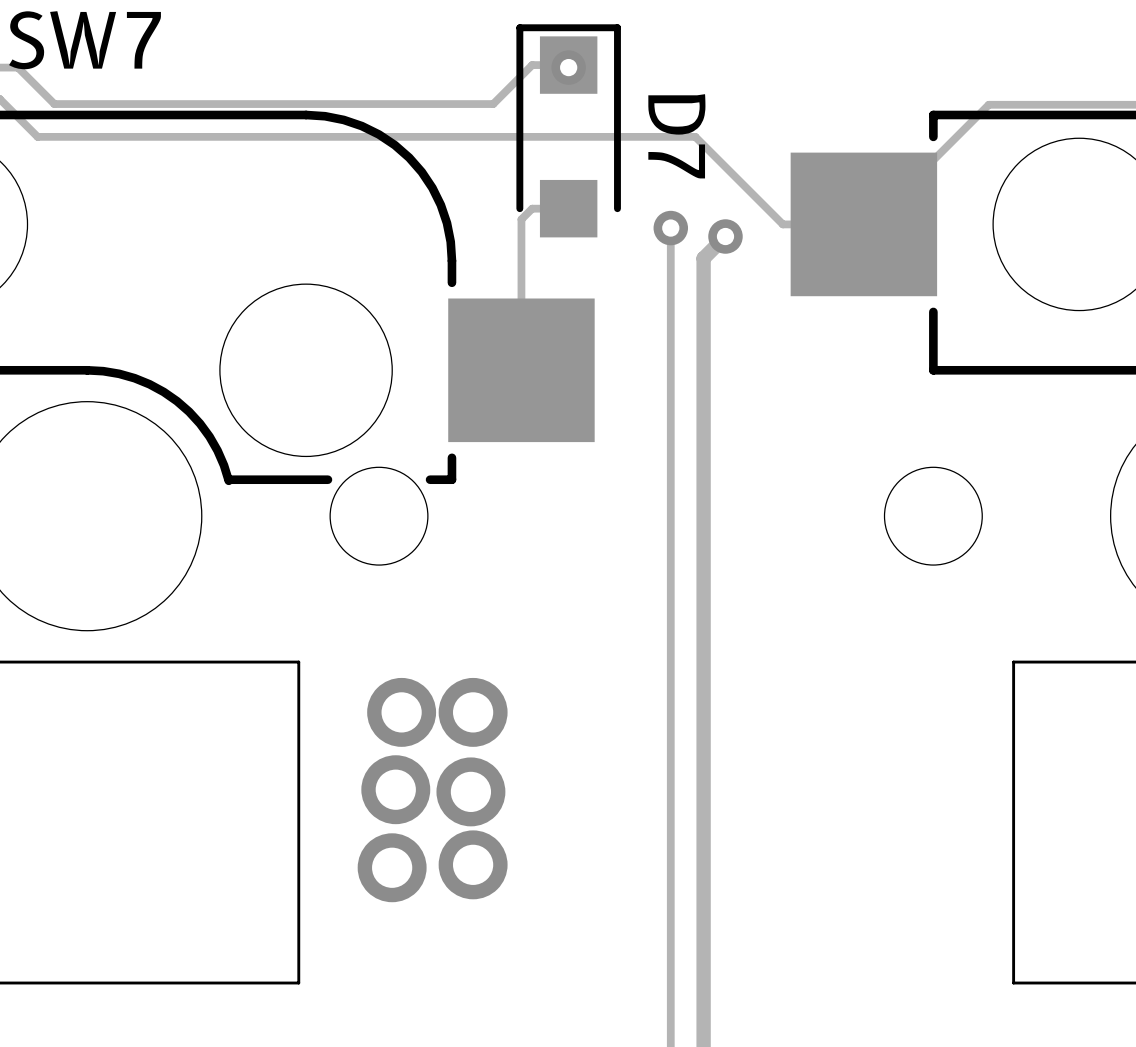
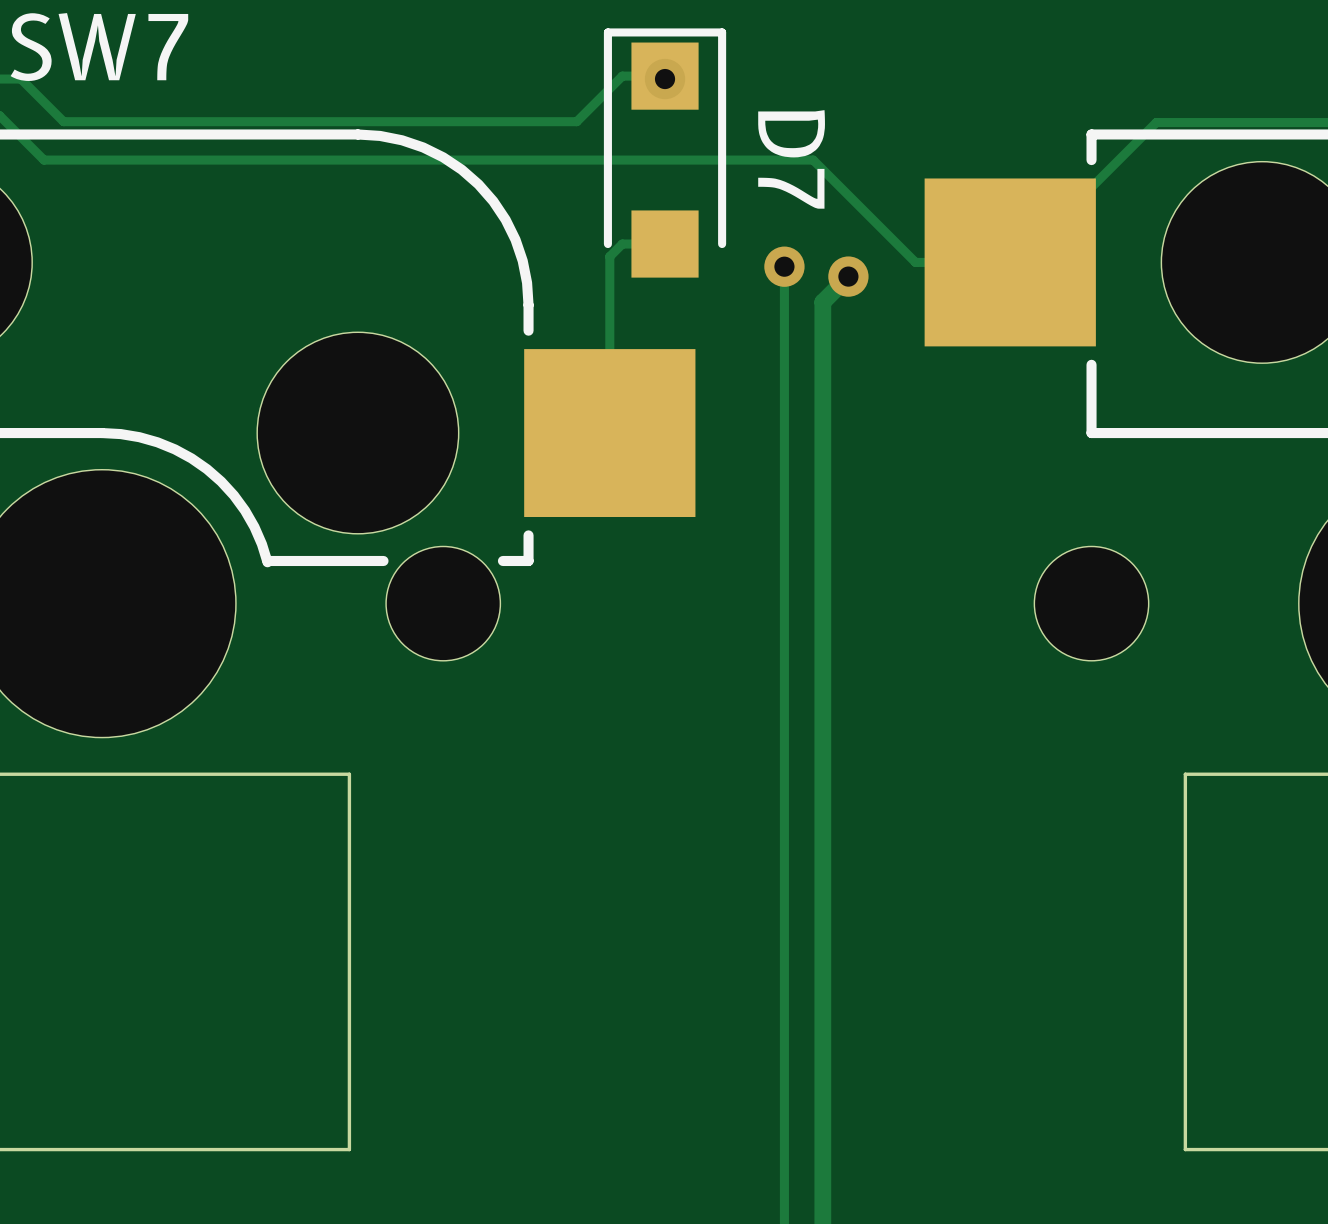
via: (401, 712) -> none
via: (473, 712) -> none
via: (395, 789) -> none
via: (470, 791) -> none
via: (473, 864) -> none
via: (392, 867) -> none

